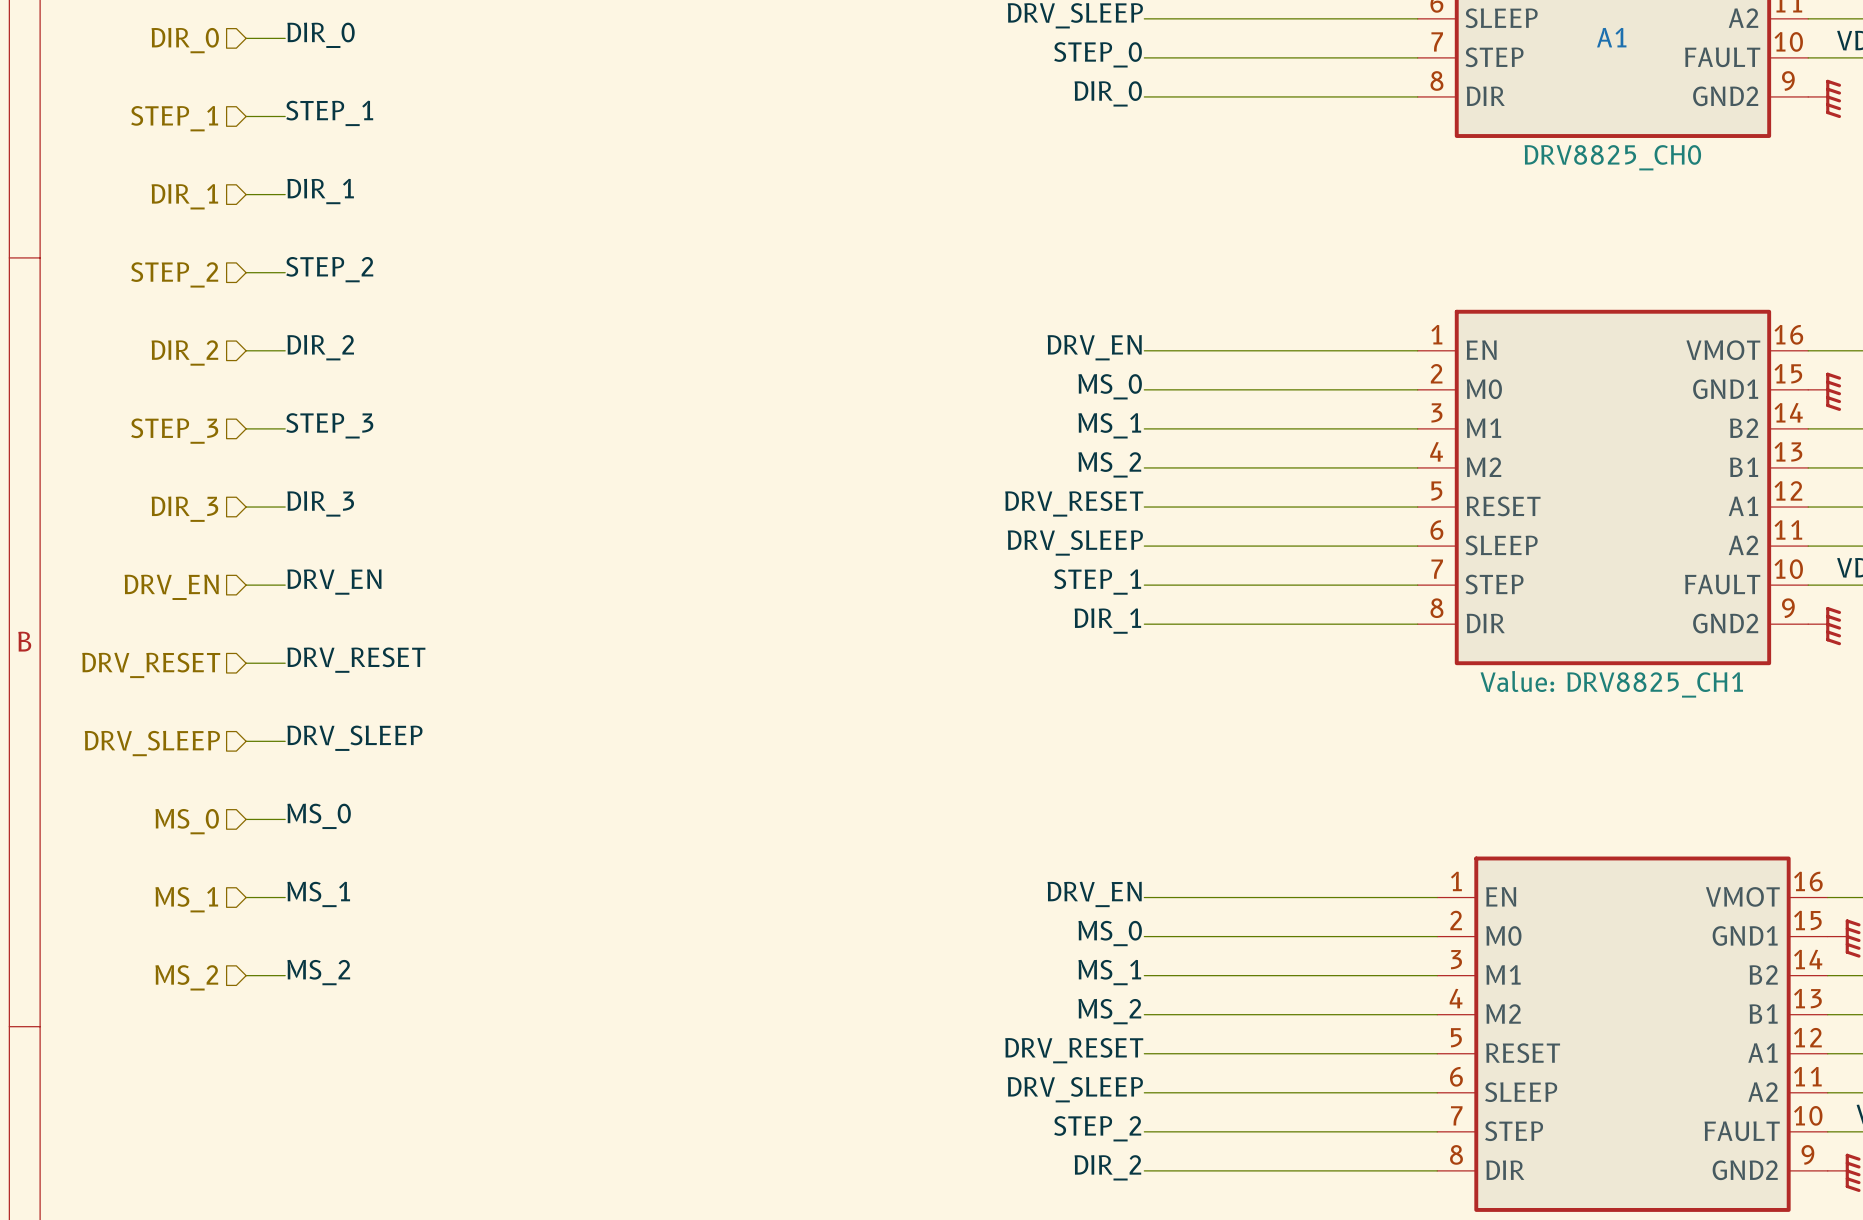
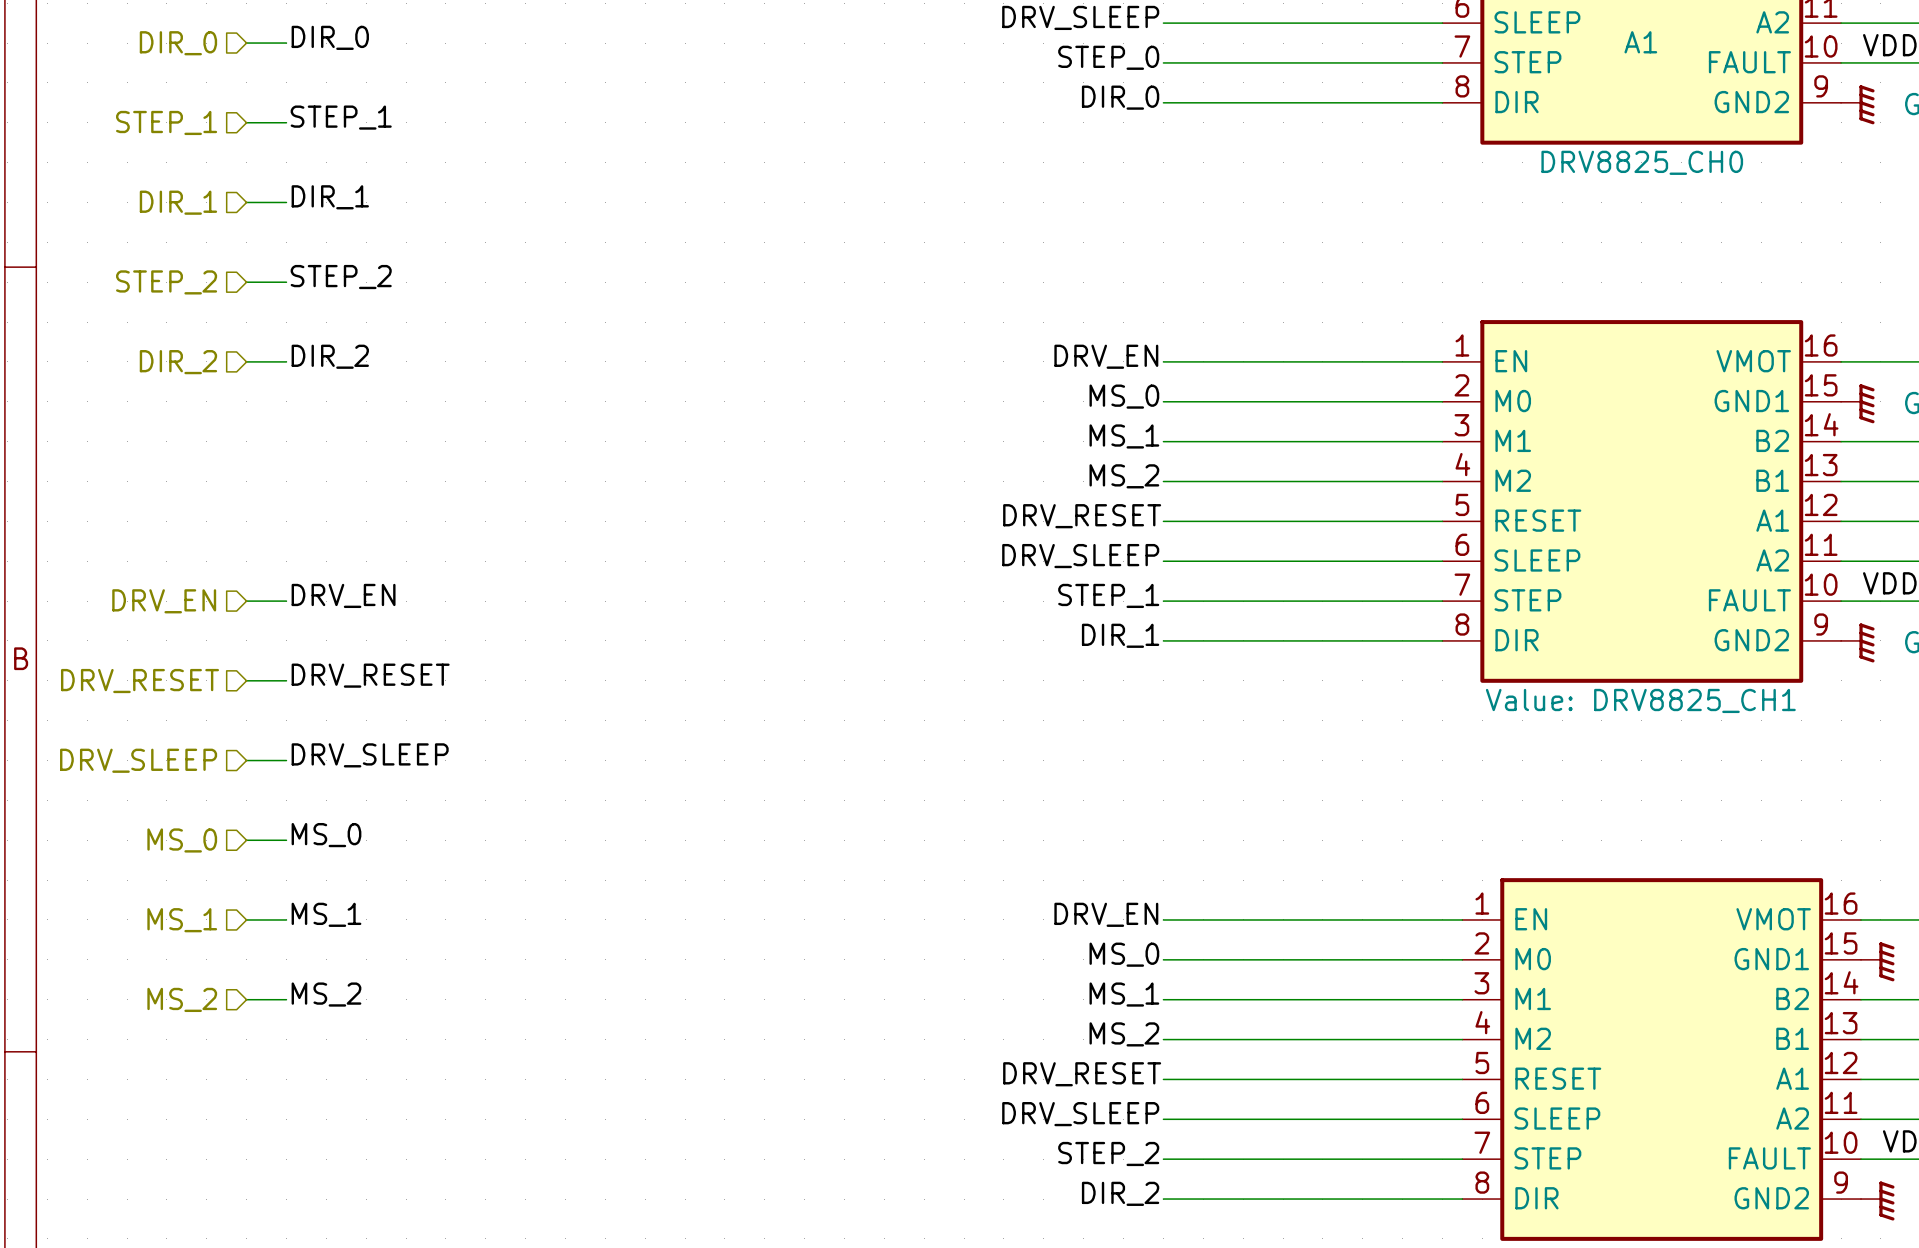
label: STEP_3 (329, 425) -> none
wire: (246, 428) (285, 428) -> none
hierarchical label: STEP_3 (174, 431) -> none
label: DIR_3 (320, 503) -> none
wire: (246, 507) (285, 507) -> none
hierarchical label: DIR_3 (184, 509) -> none

